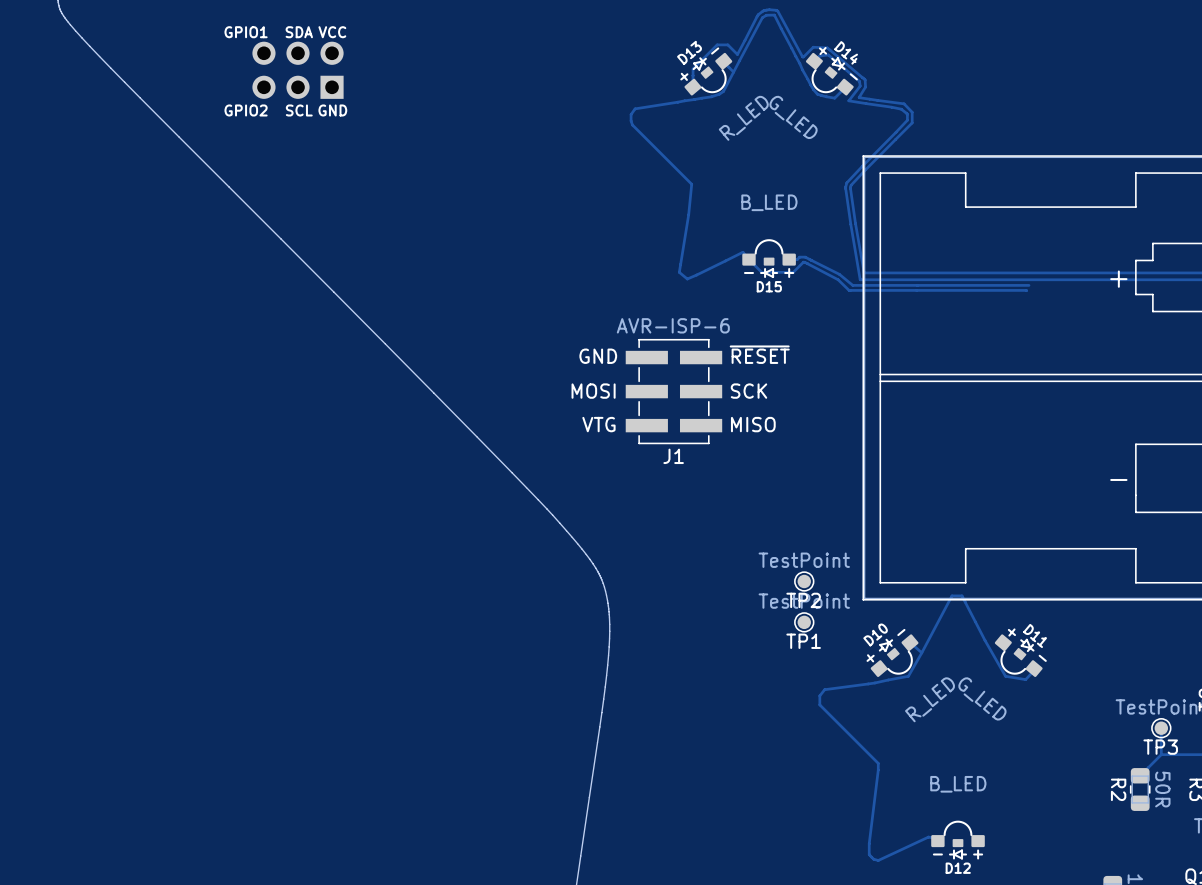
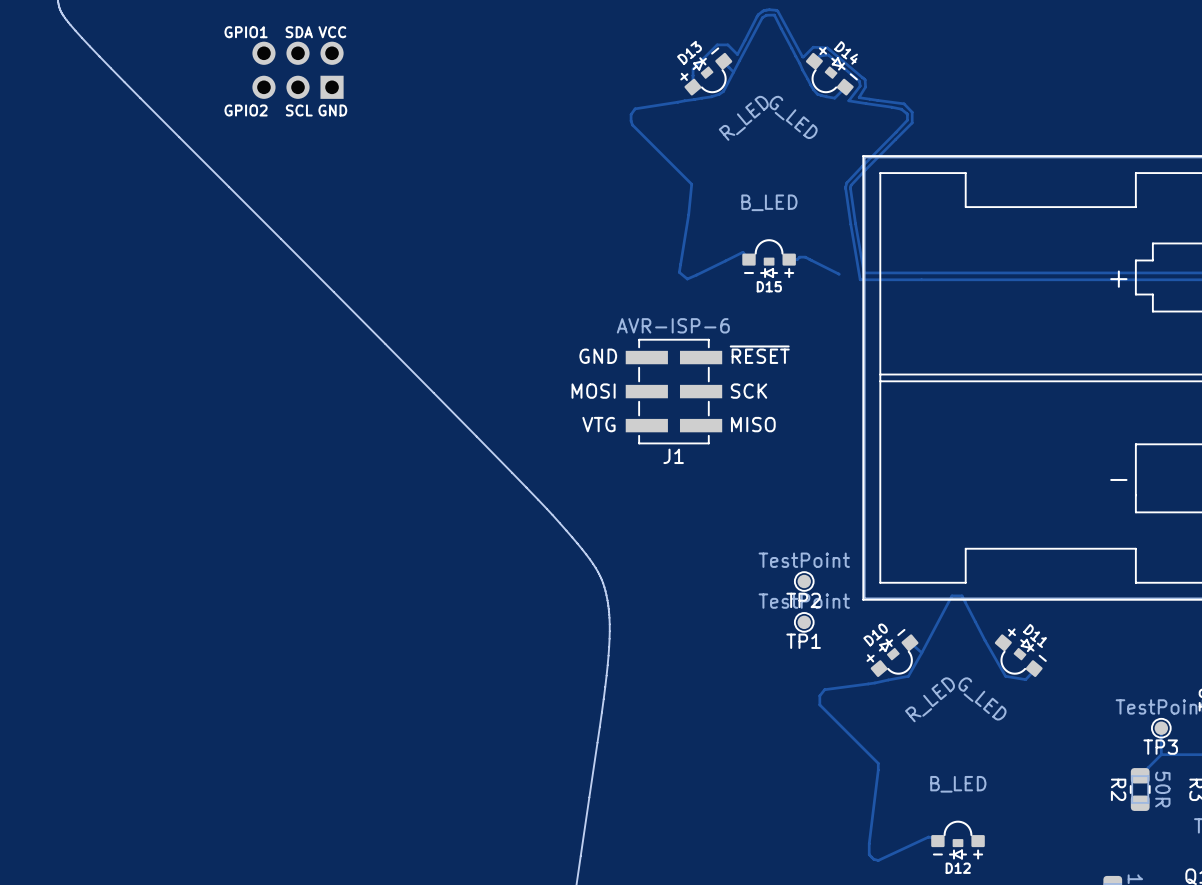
track: (748, 259) (761, 272) (793, 272) (803, 262) -> none
track: (803, 262) (838, 279) (849, 290) (1026, 290) -> none
track: (839, 274) (852, 285) (1029, 285) -> none

